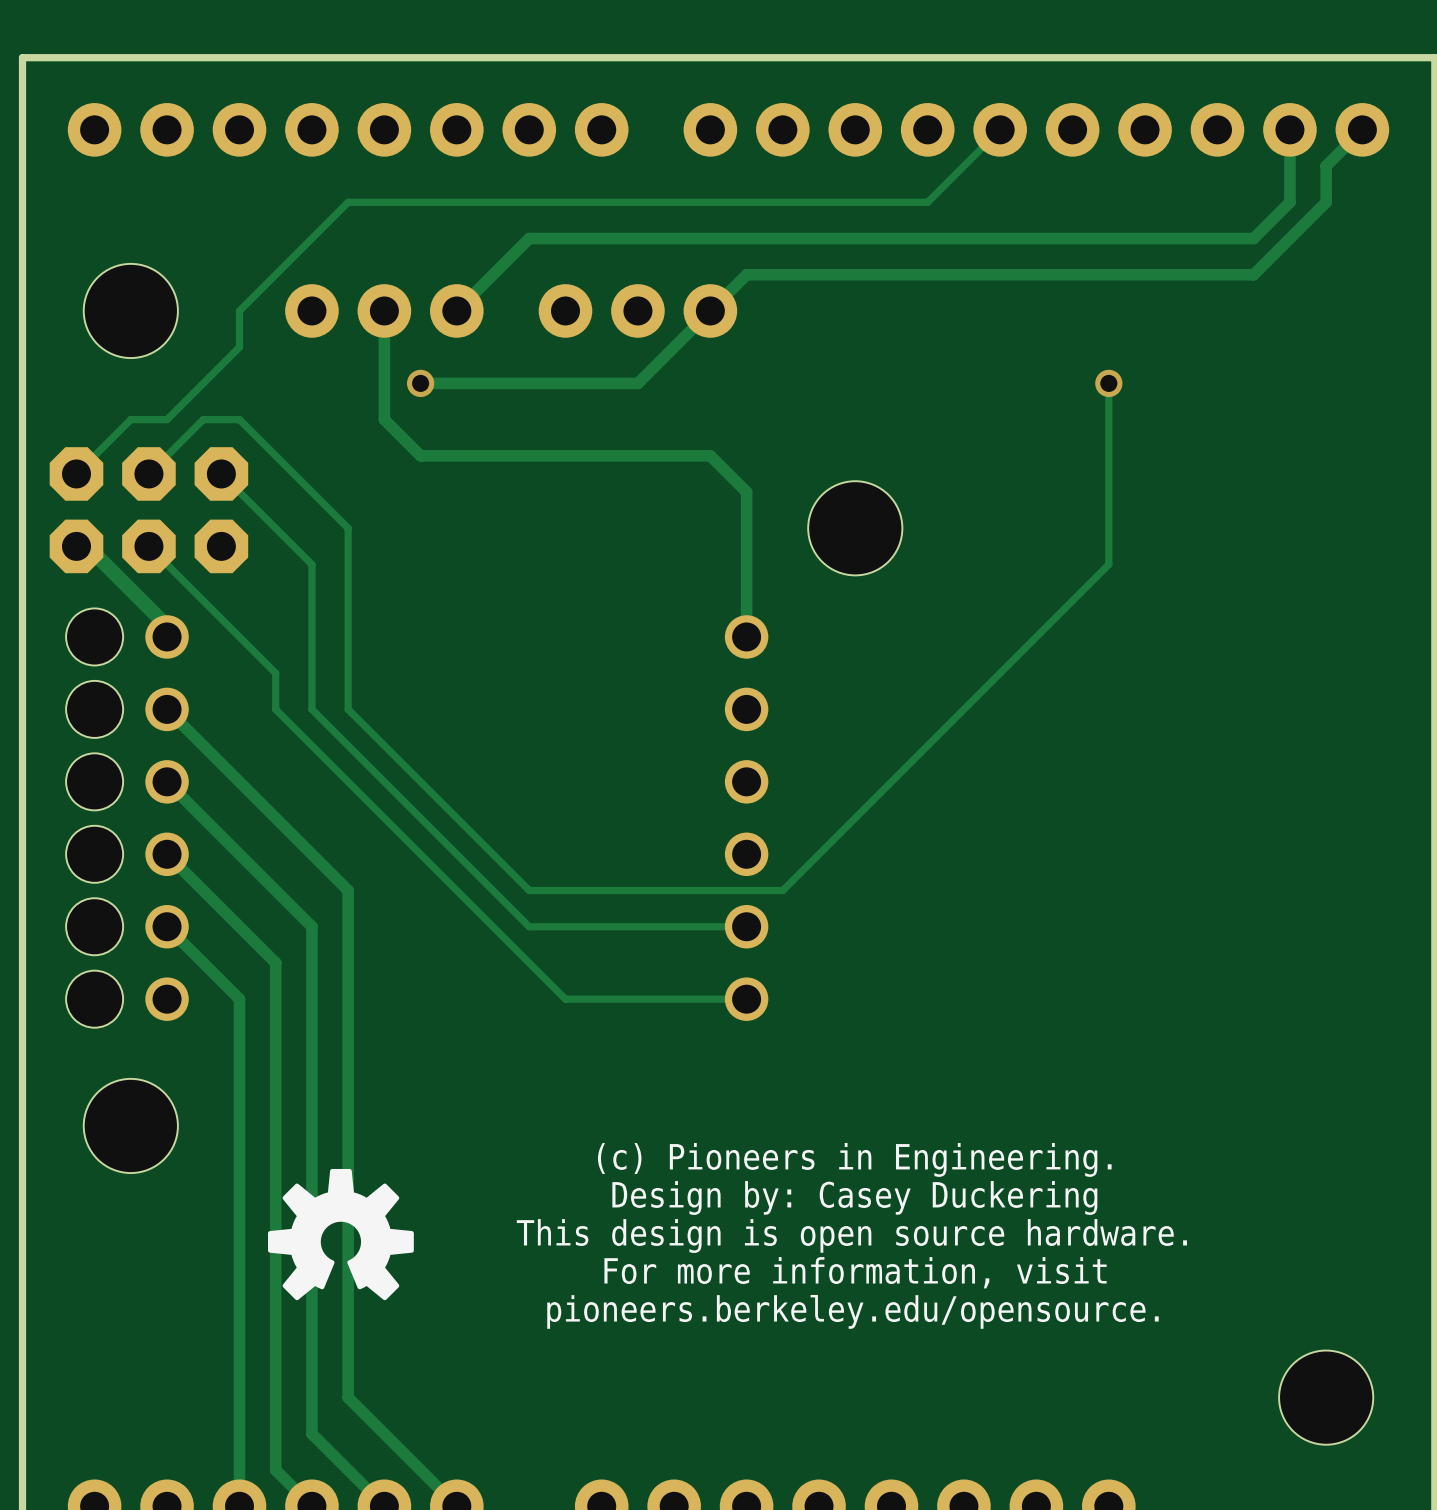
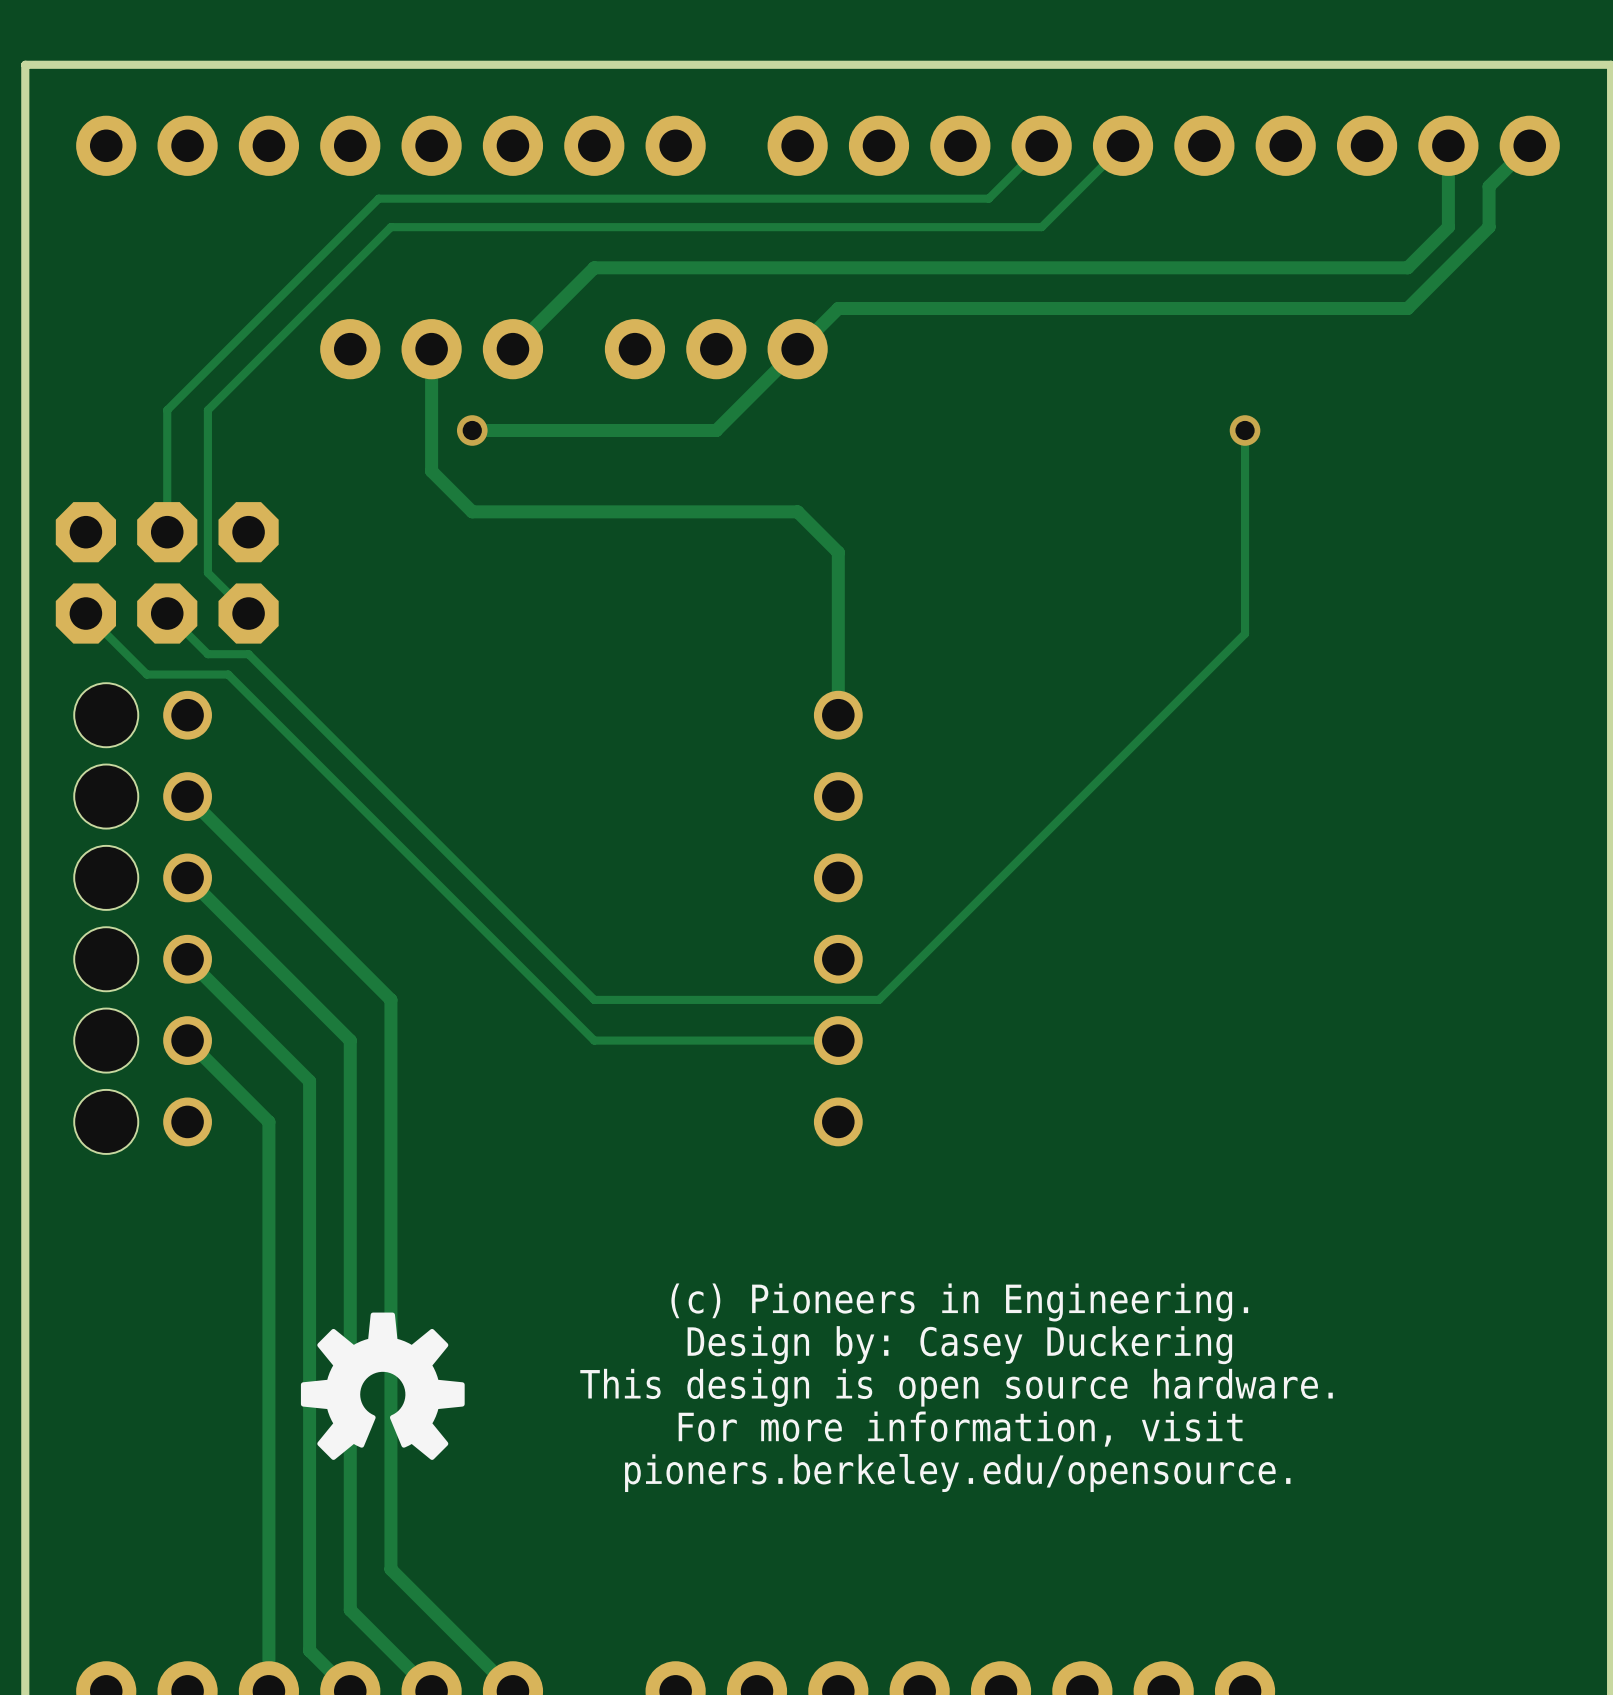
track: none -> (1041, 145) (988, 198) (378, 198) (167, 410) (167, 532)
part: (130, 310) -> none
track: (239, 310) (239, 347) (167, 419) (130, 419) (76, 473) -> (268, 349) (207, 410) (207, 572) (248, 613)
track: (148, 473) (203, 419) (239, 419) (348, 528) (348, 709) -> (207, 654) (248, 654) (390, 796)
track: (221, 473) (311, 564) (311, 709) -> (309, 755) (350, 796)
part: (855, 528) -> none
track: (76, 546) (87, 546) (167, 626) (167, 636) -> (85, 613) (146, 674) (228, 674)
track: (185, 582) (203, 600) -> none
track: (275, 673) (275, 709) (565, 999) (746, 999) -> none
part: (130, 1125) -> none
text: pioneers.berkeley.edu/opensource. (852, 1311) -> pioners.berkeley.edu/opensource. (957, 1473)
part: (1326, 1397) -> none

